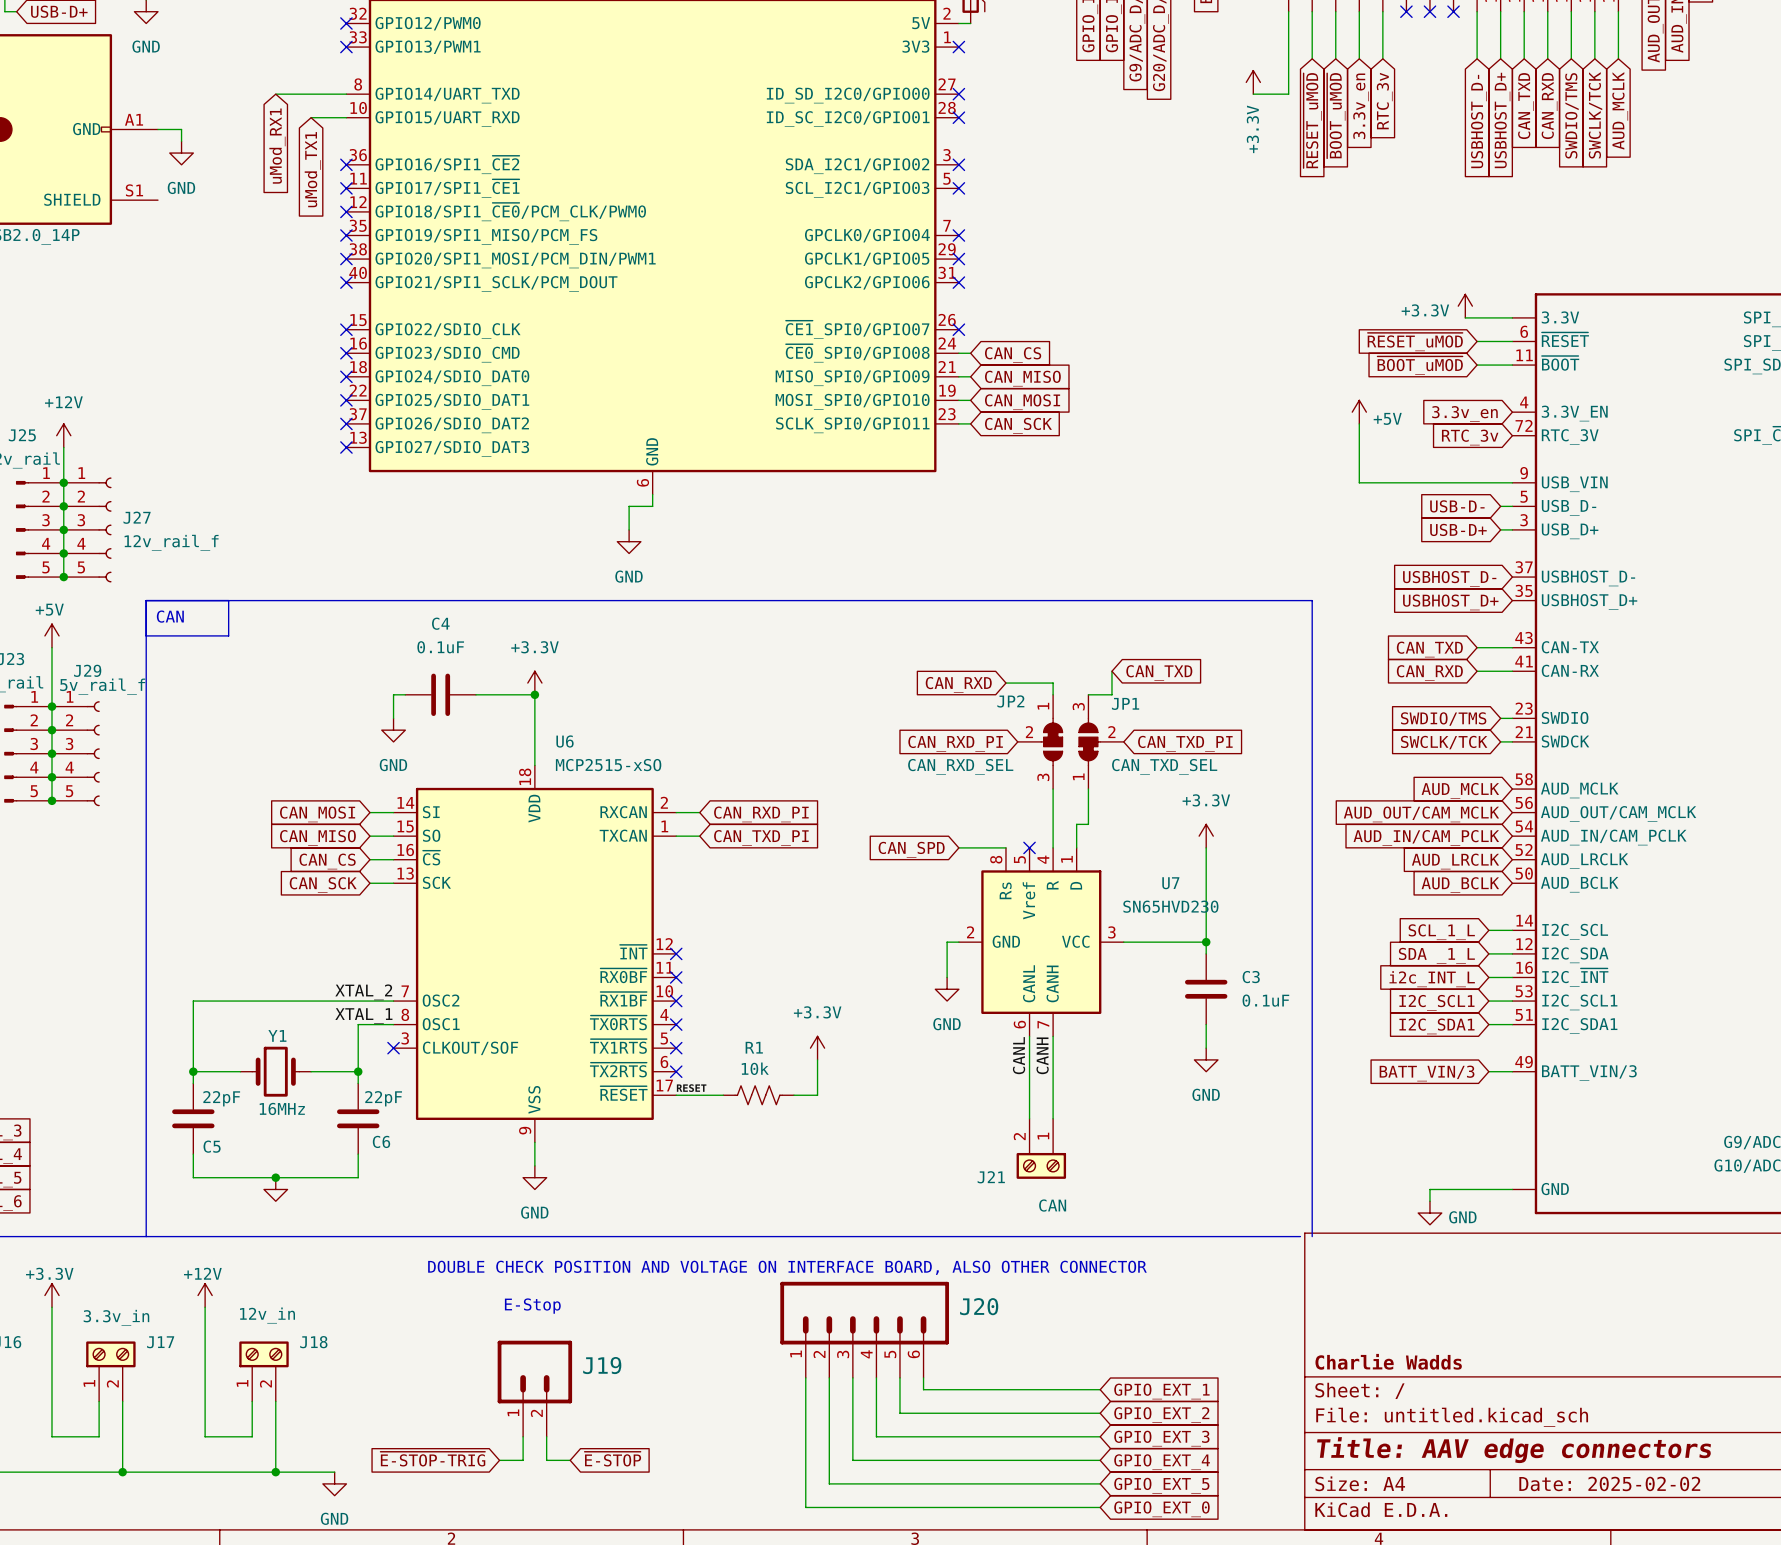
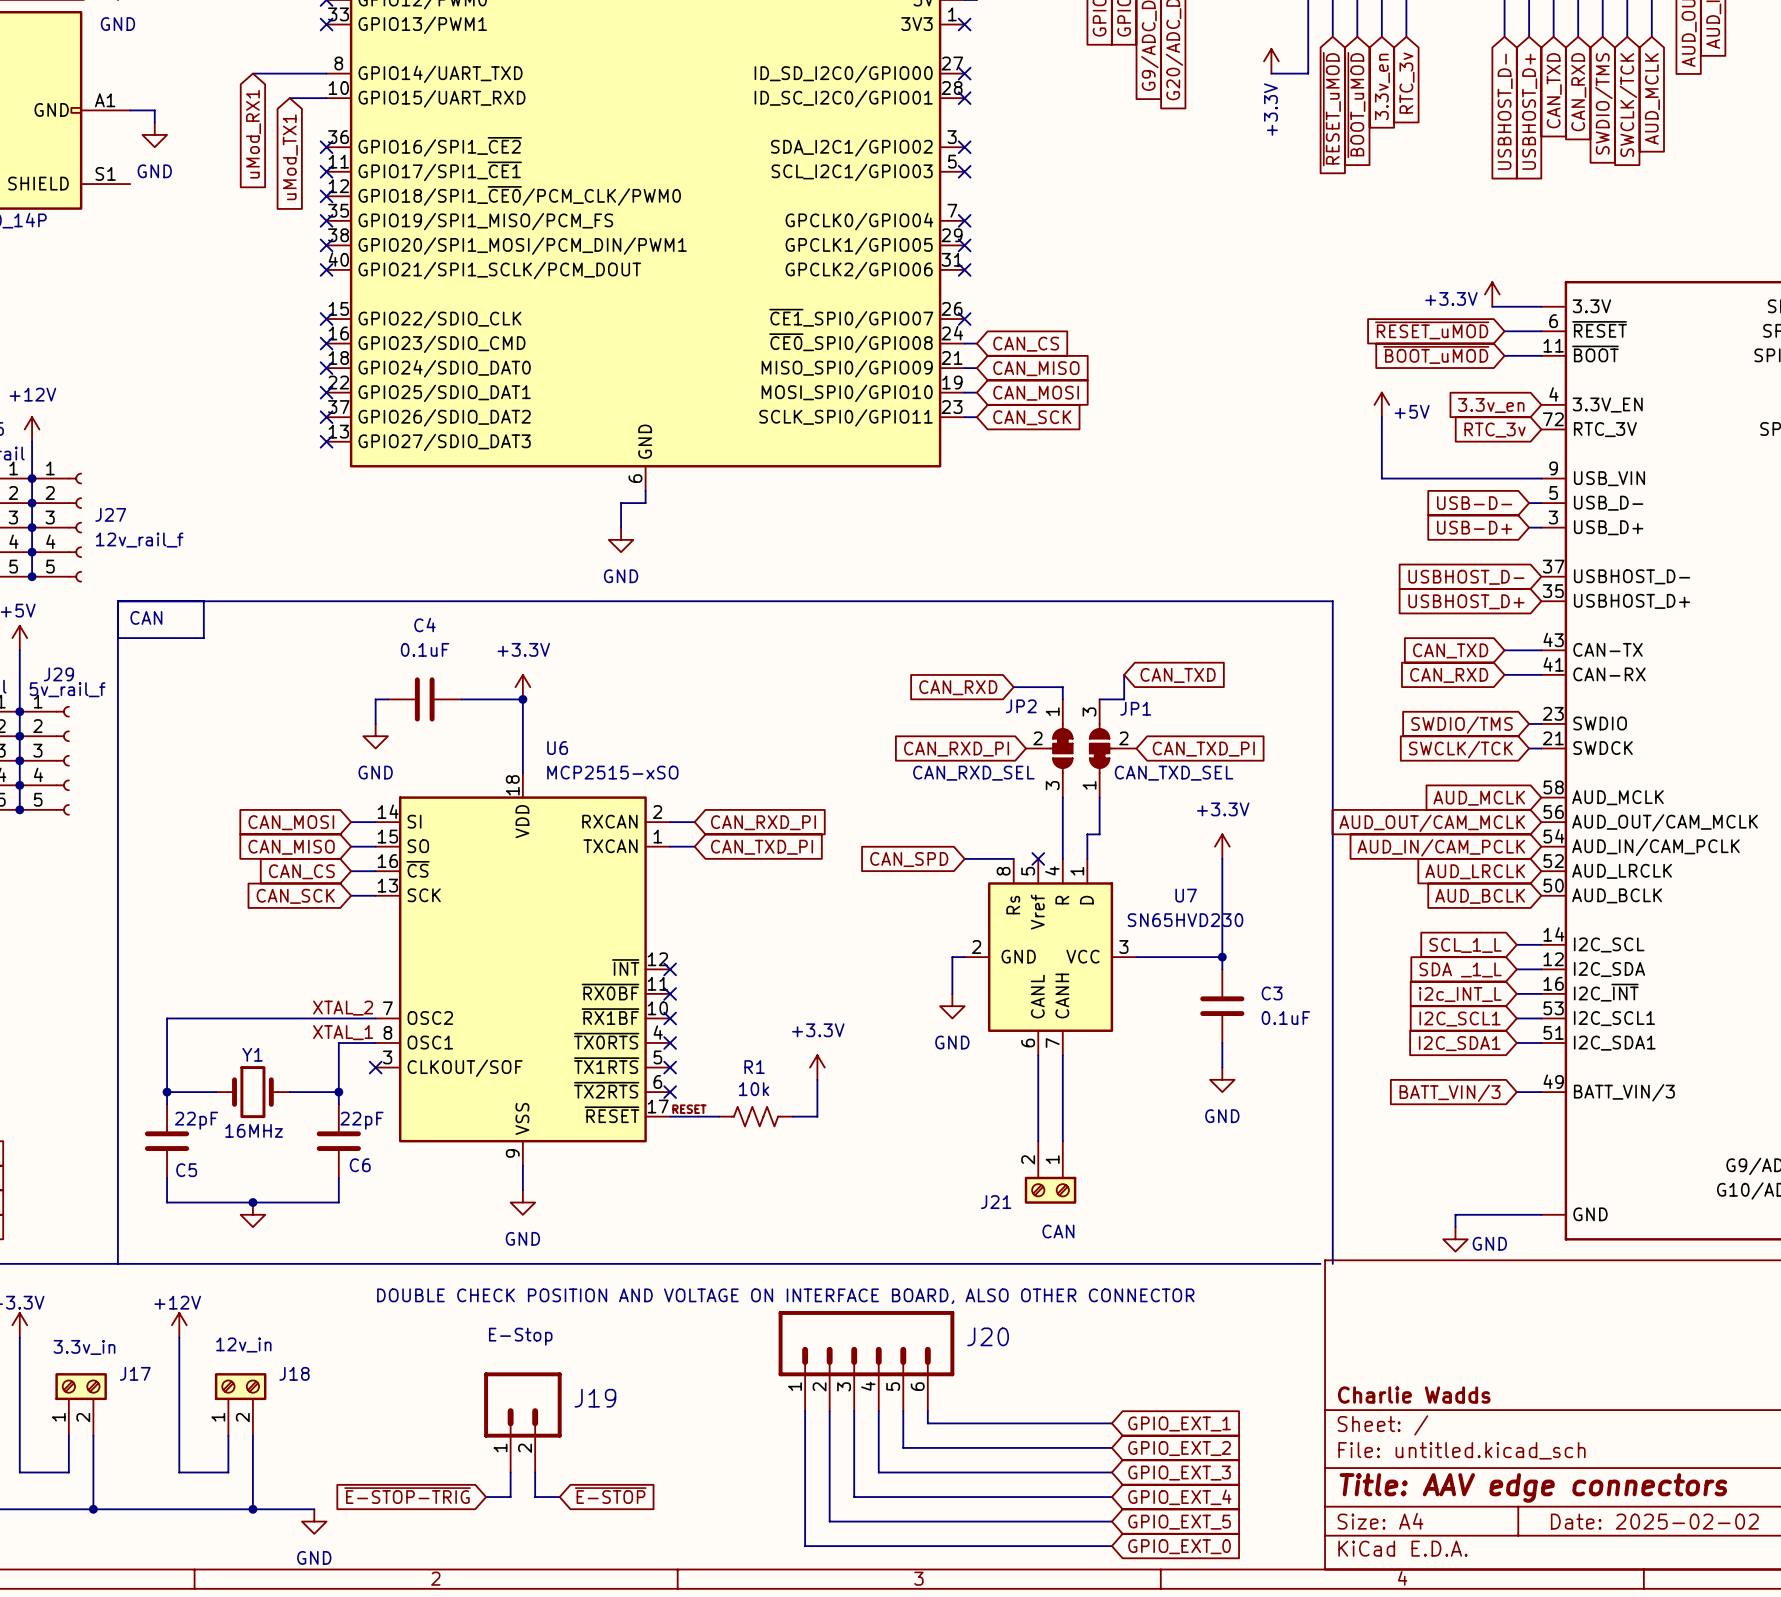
label: CANL (1019, 1055) -> none
label: CANH (1042, 1055) -> none

